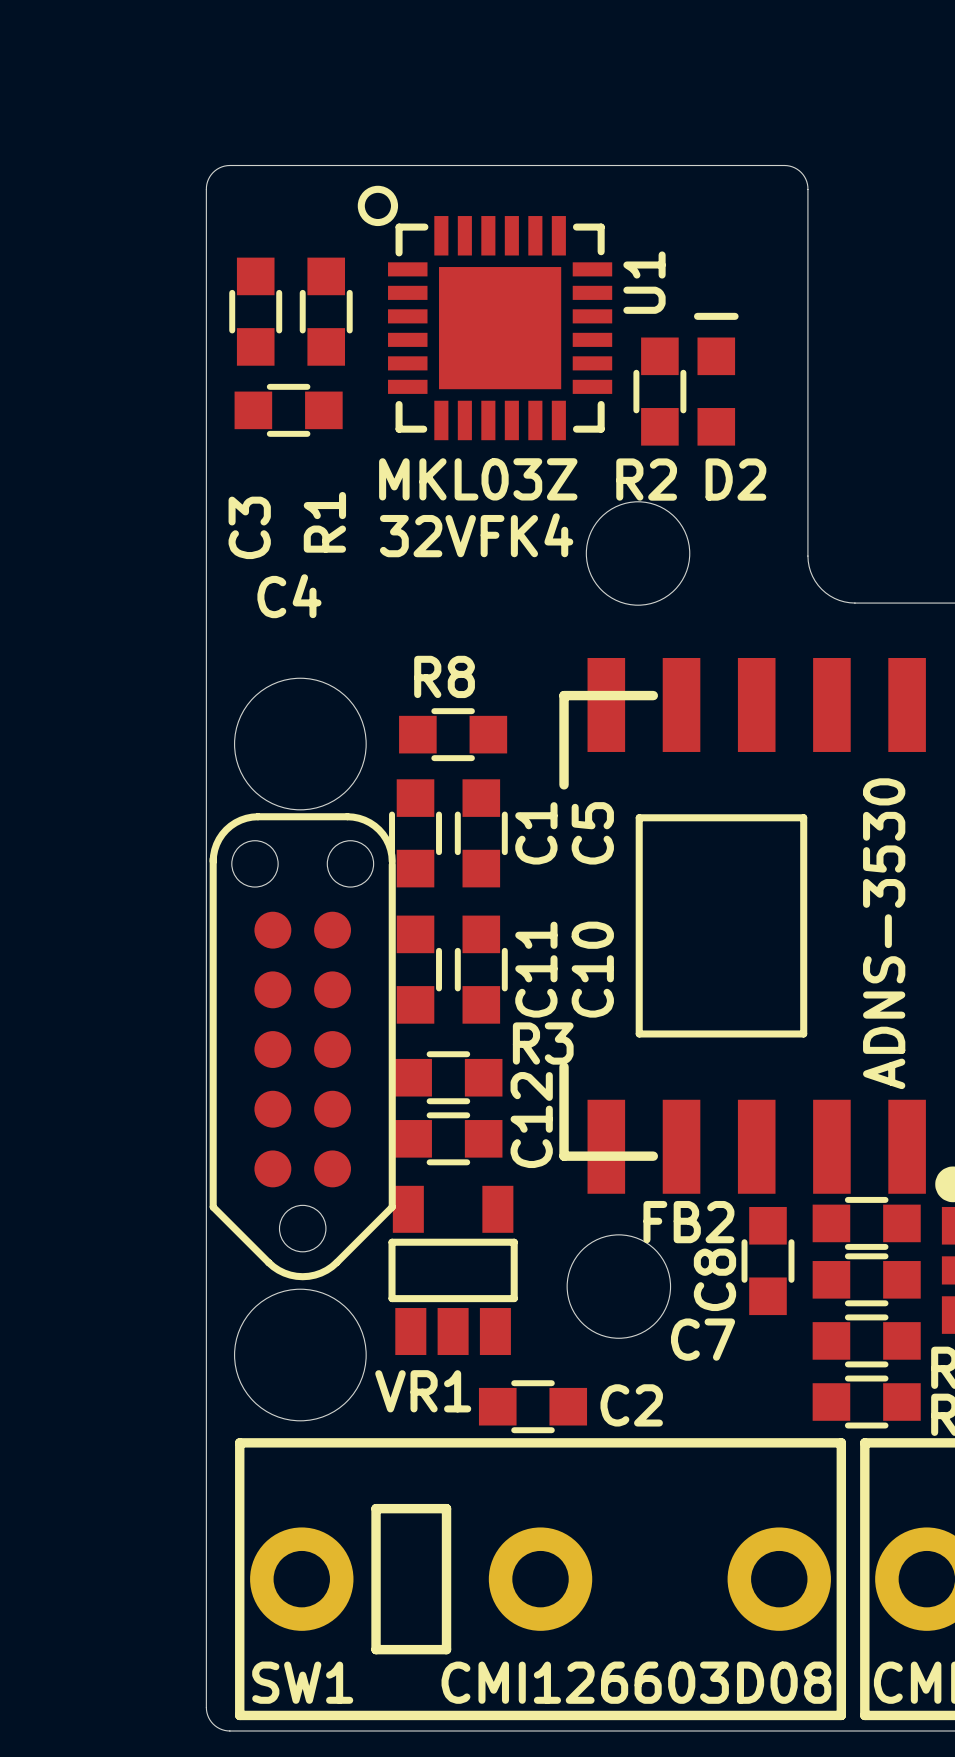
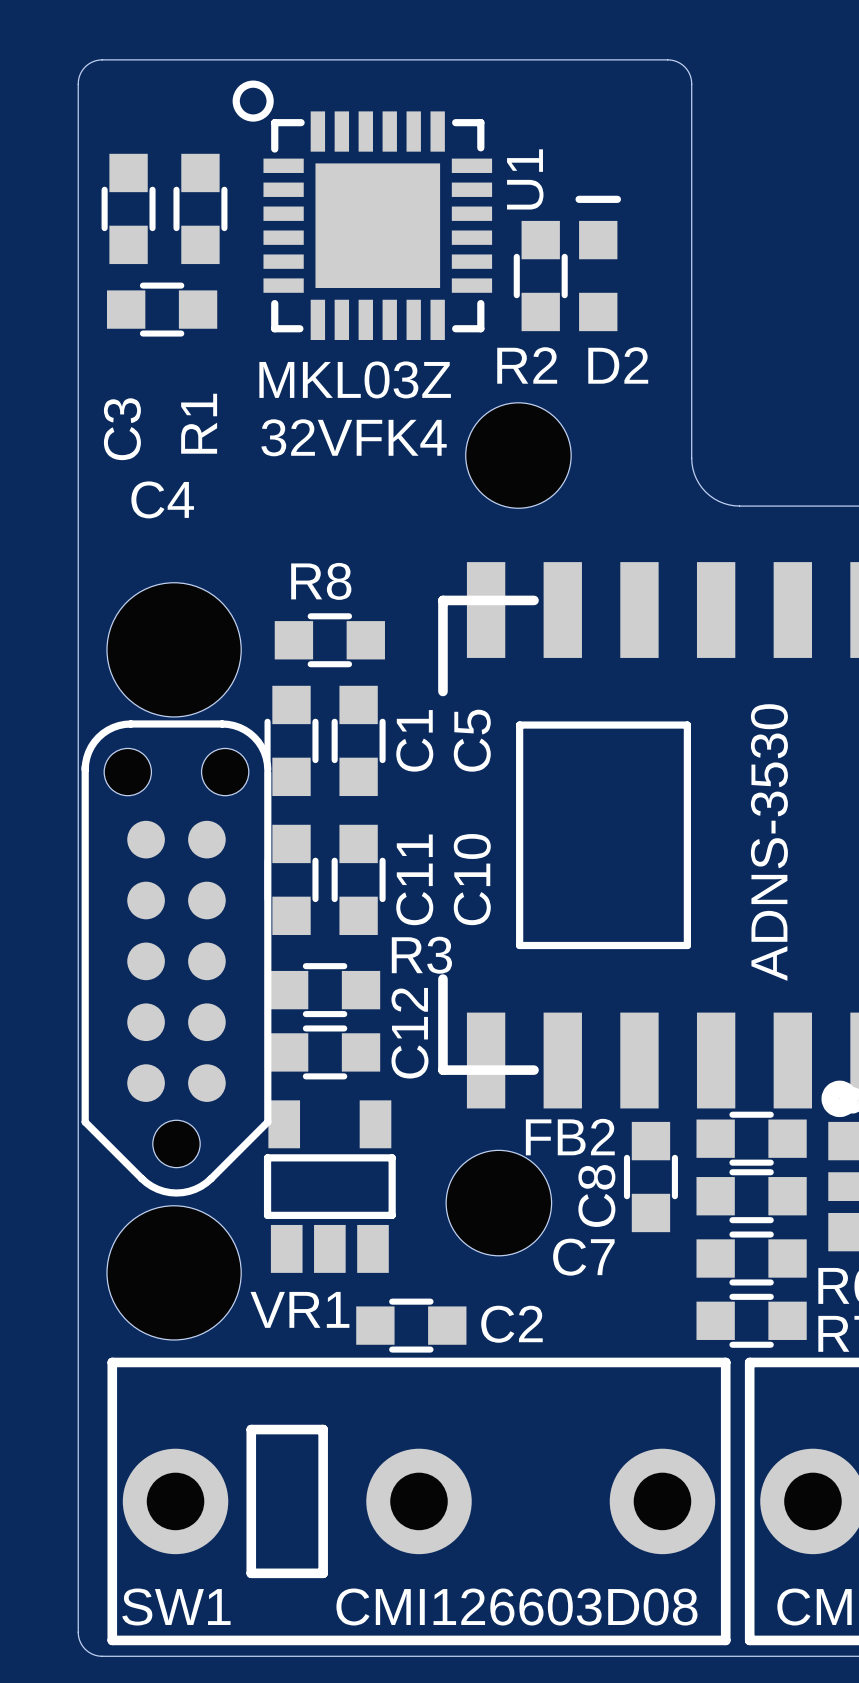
D2 position: (716, 379) -> (598, 263)
R2 position: (659, 391) -> (540, 276)

